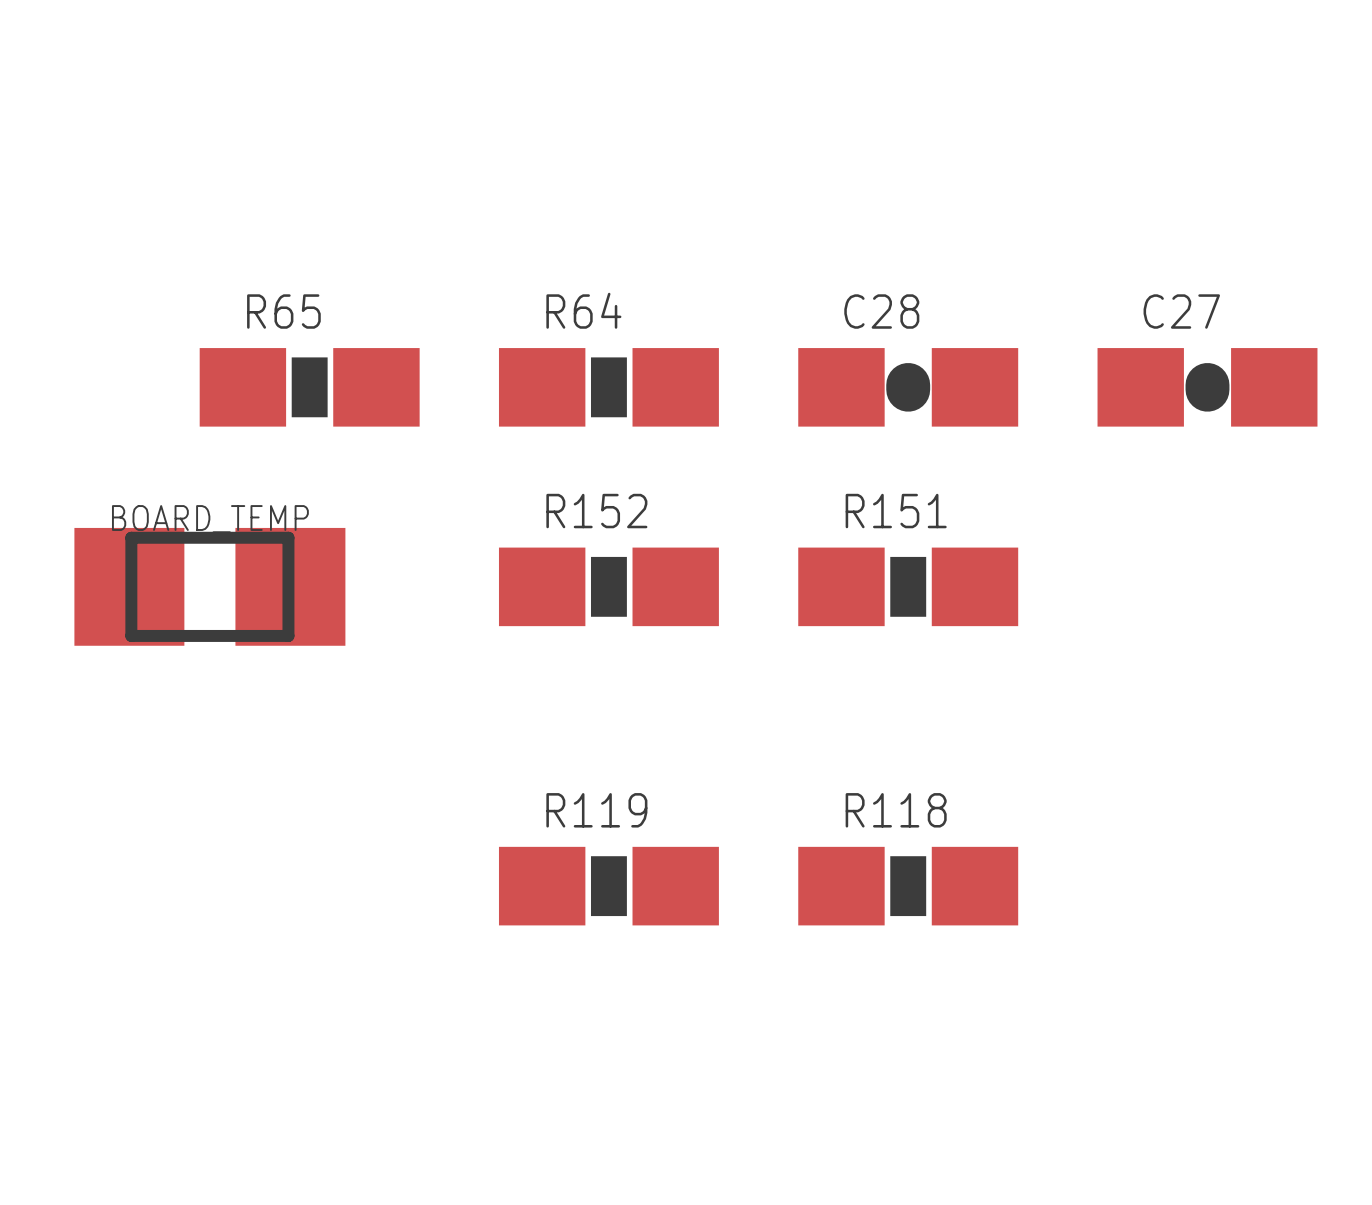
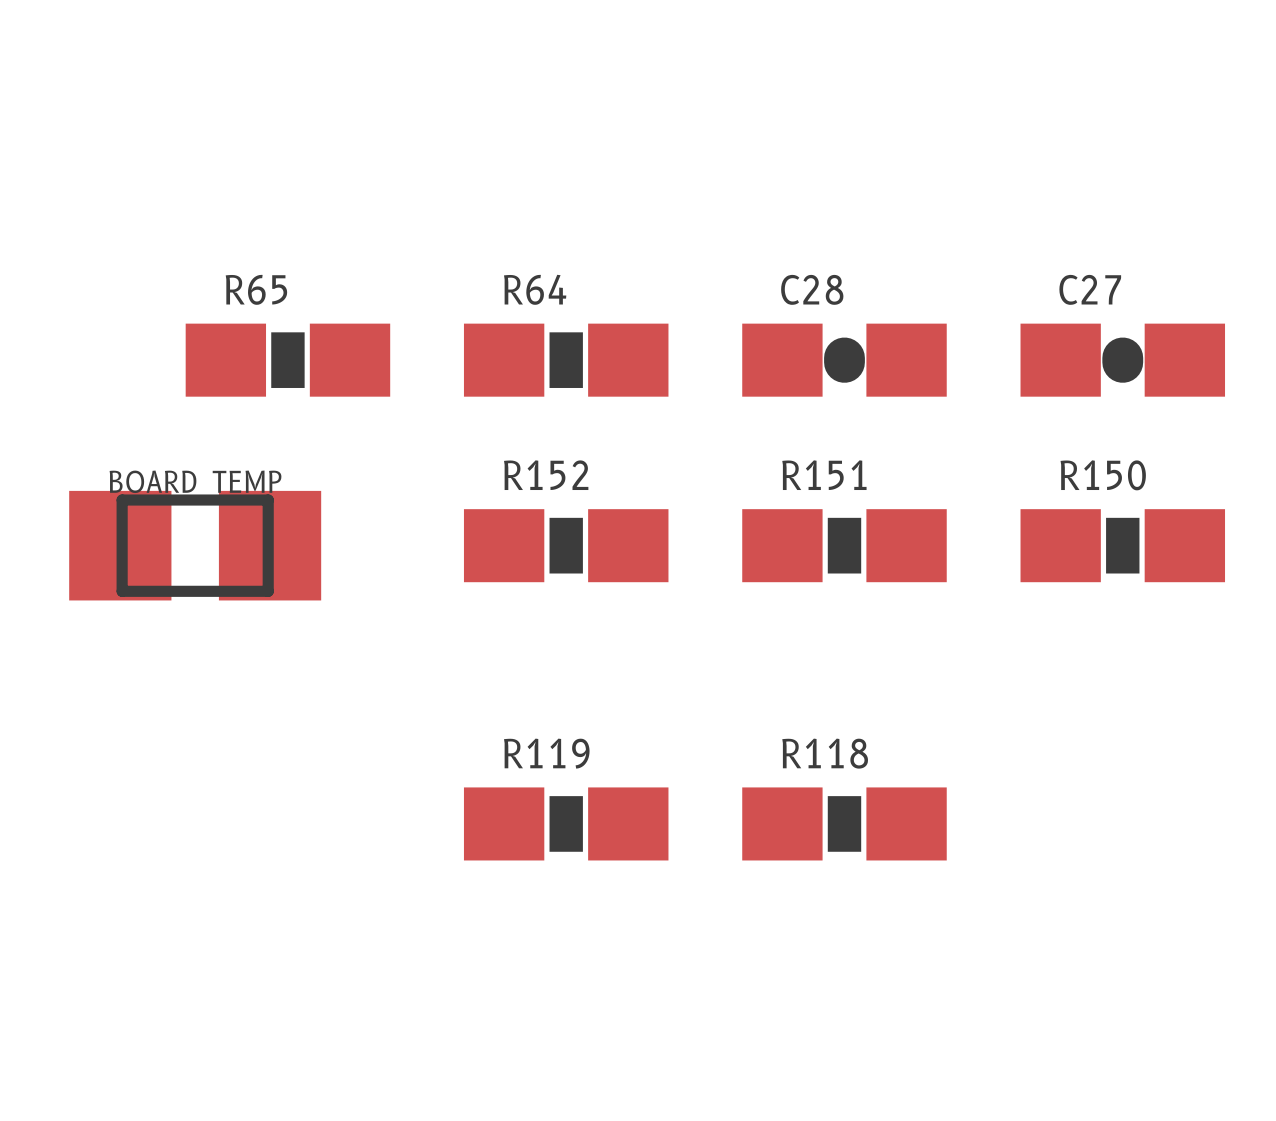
R150: none -> (1122, 545)

